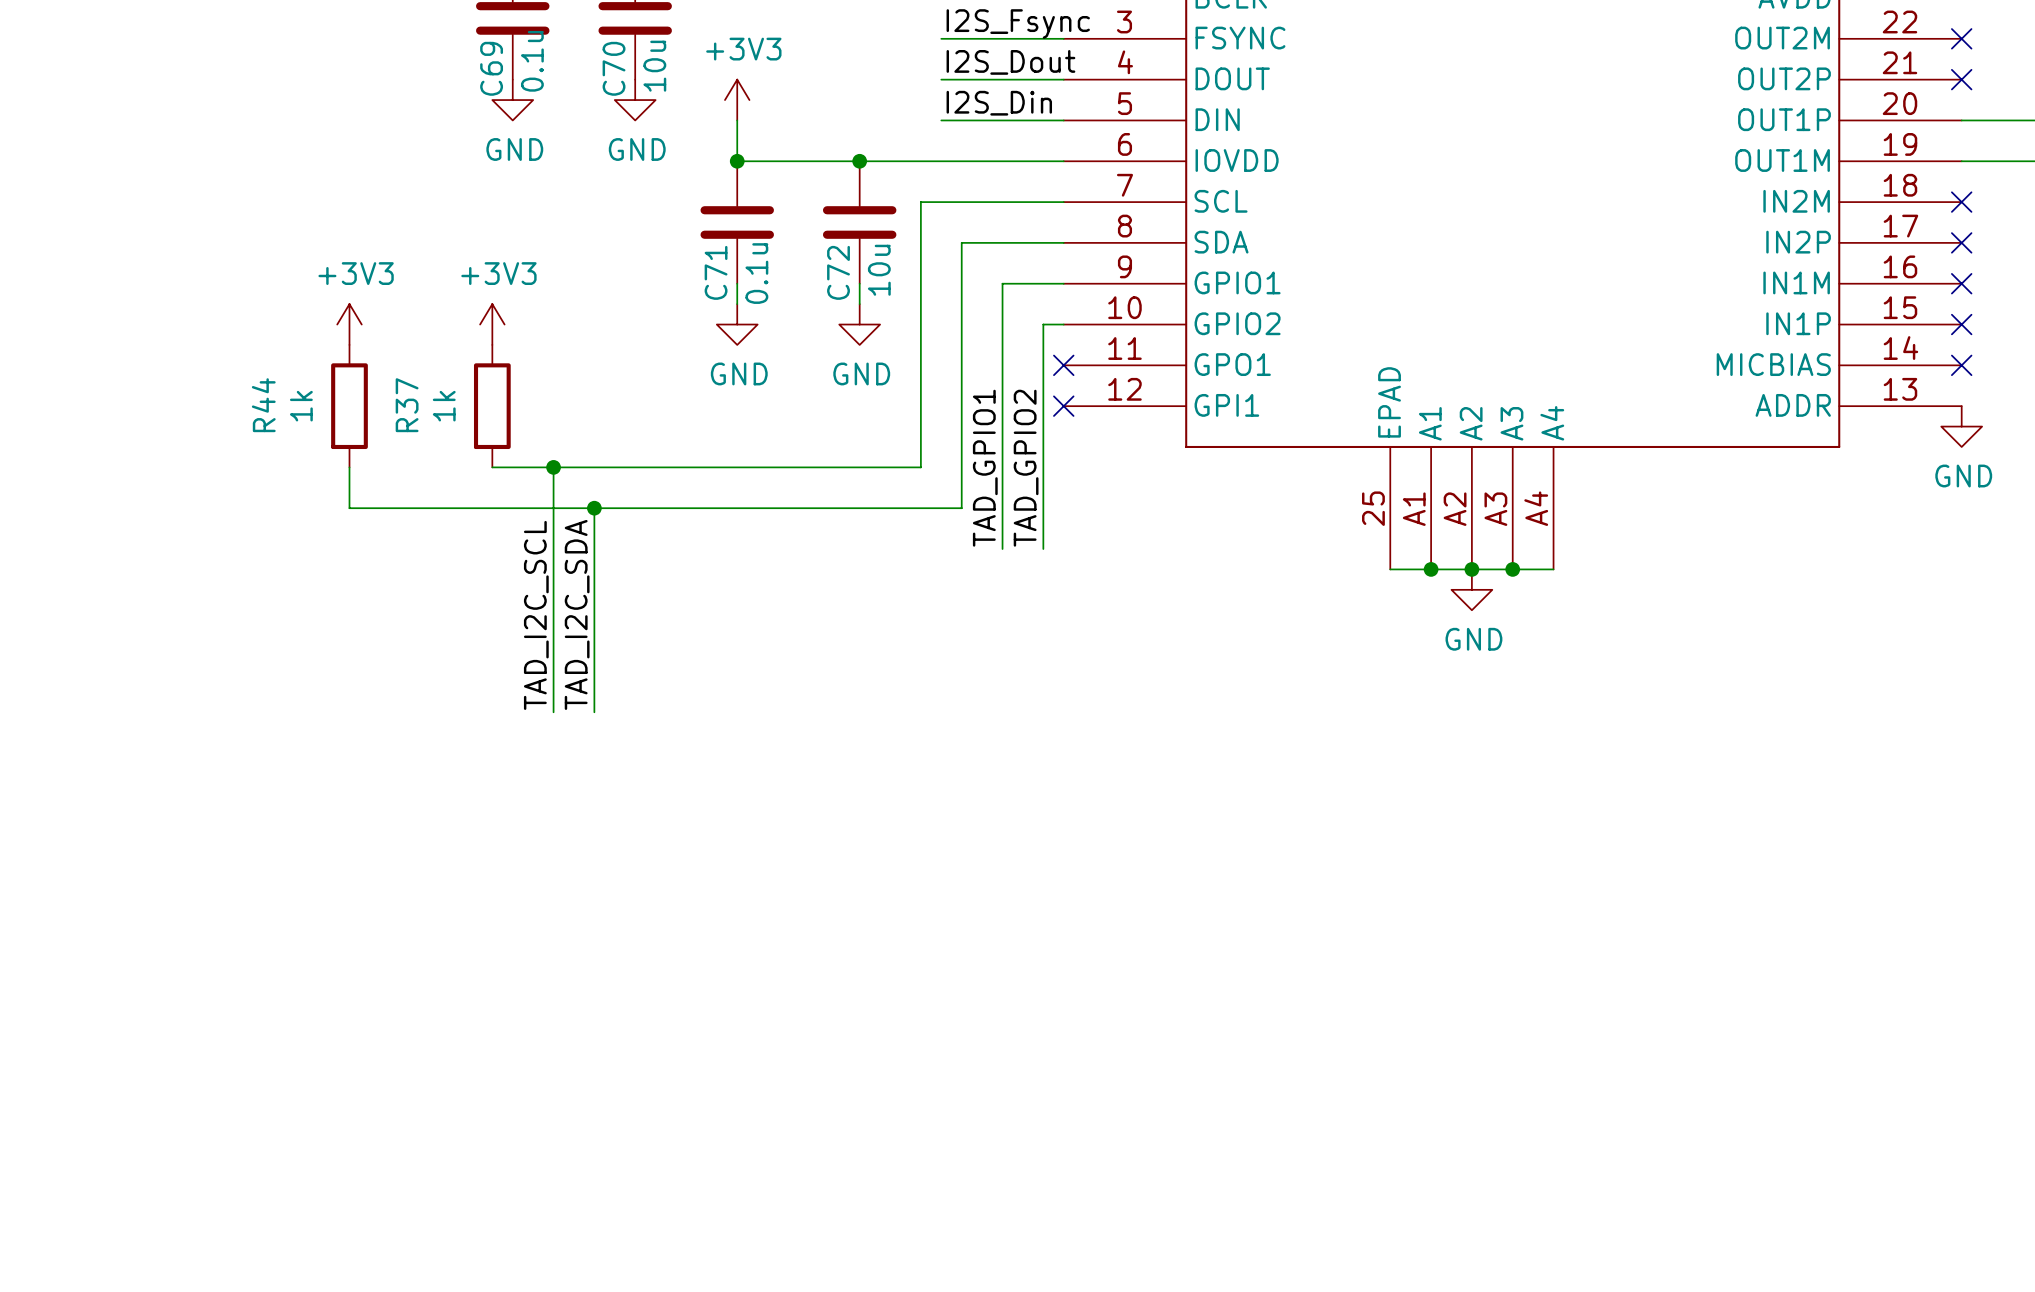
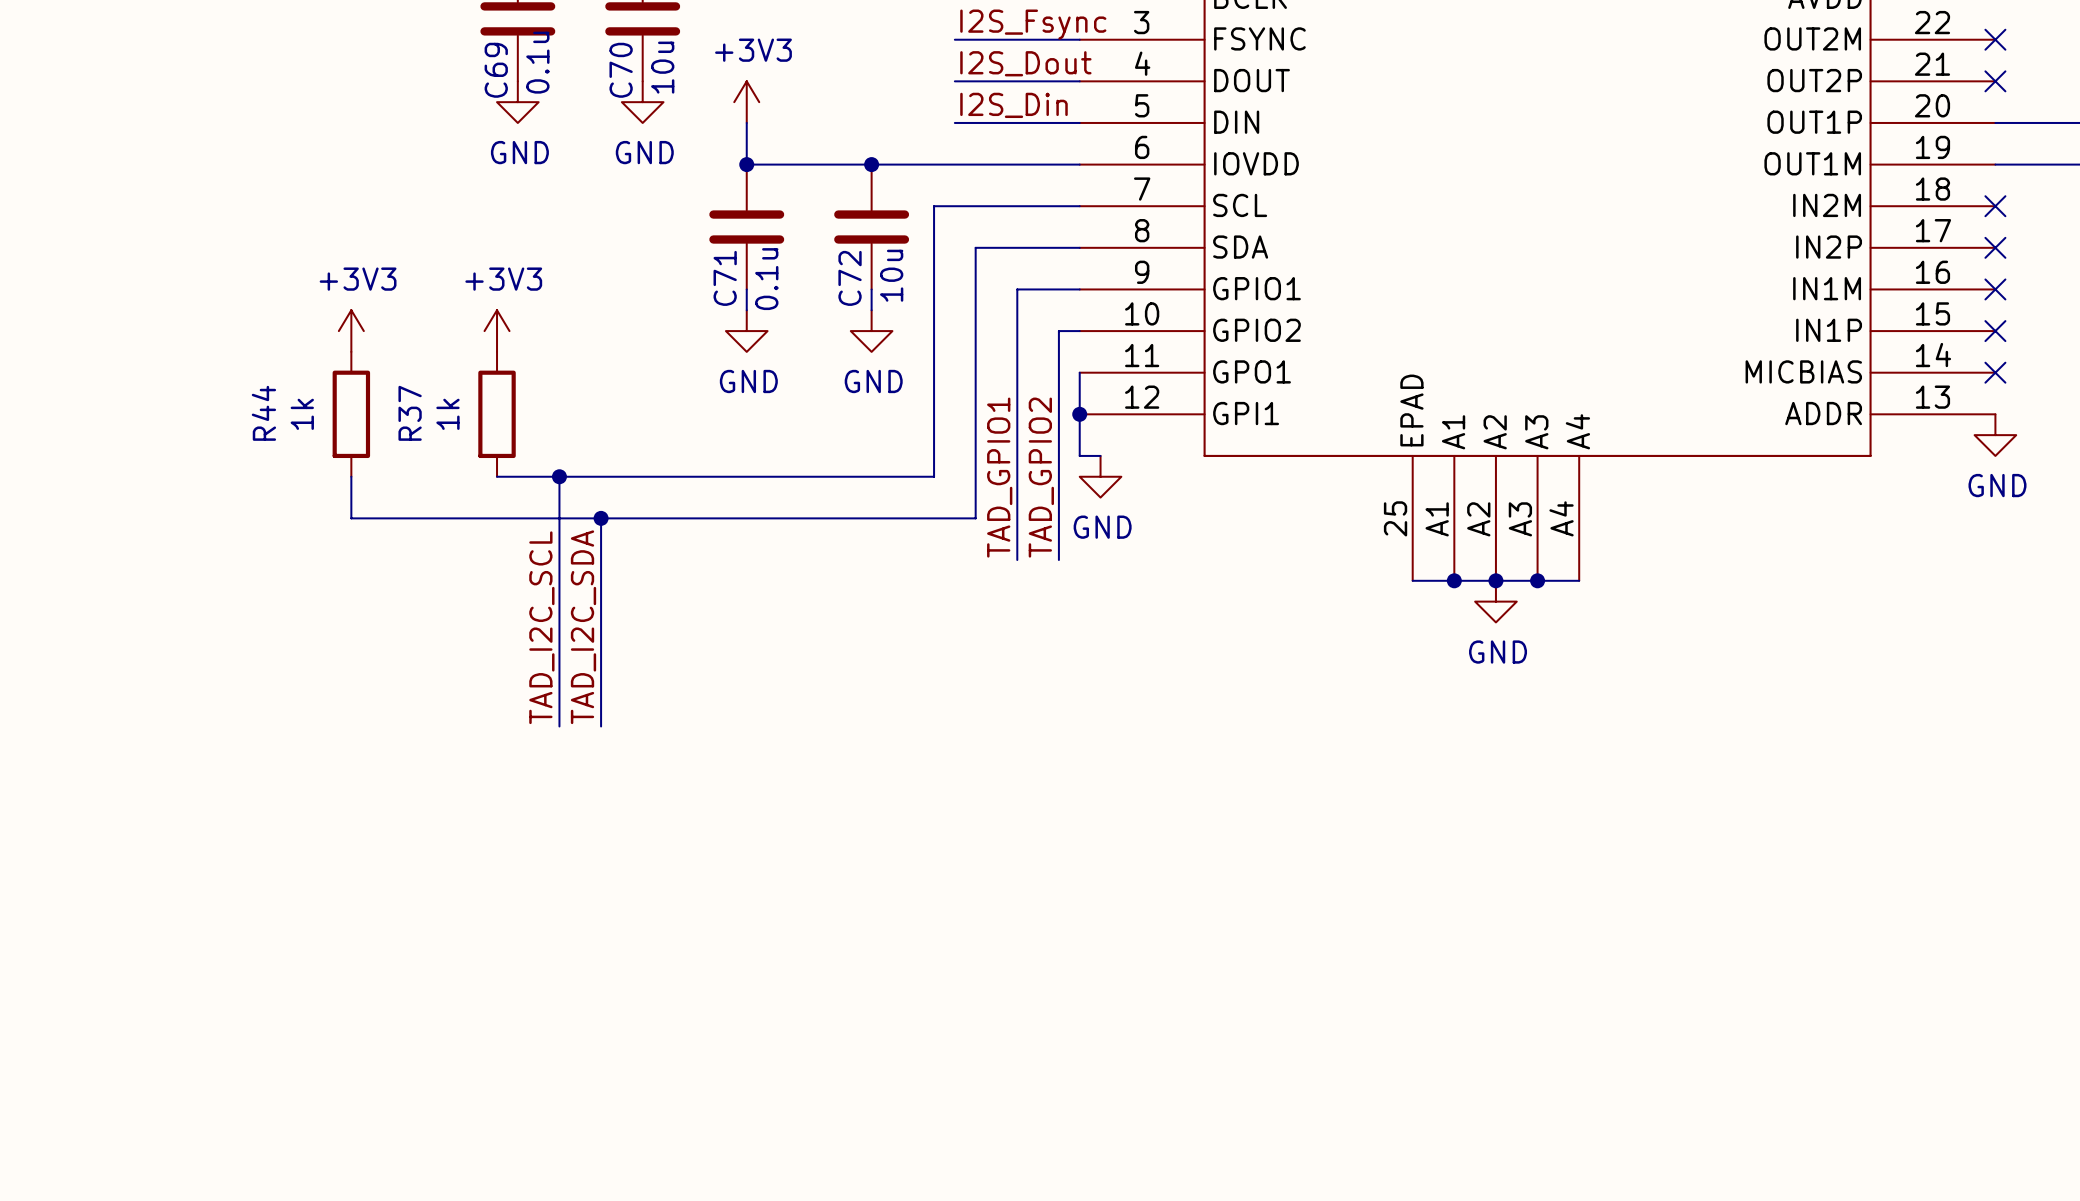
wire: none -> (1079, 372) (1079, 455) (1100, 455)
no-connect mark: (1063, 365) -> none
no-connect mark: (1063, 406) -> none
junction: none -> (1079, 414)
power symbol: none -> GND (1100, 476)

